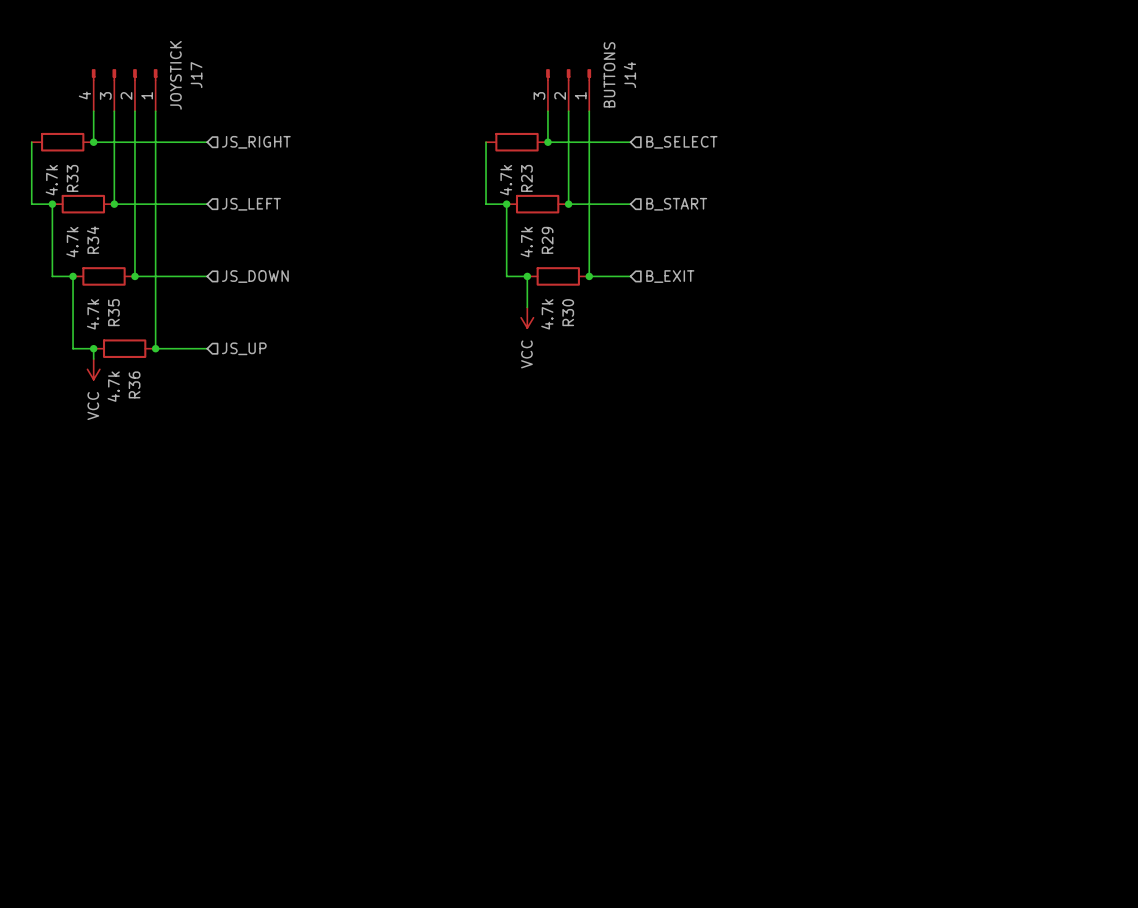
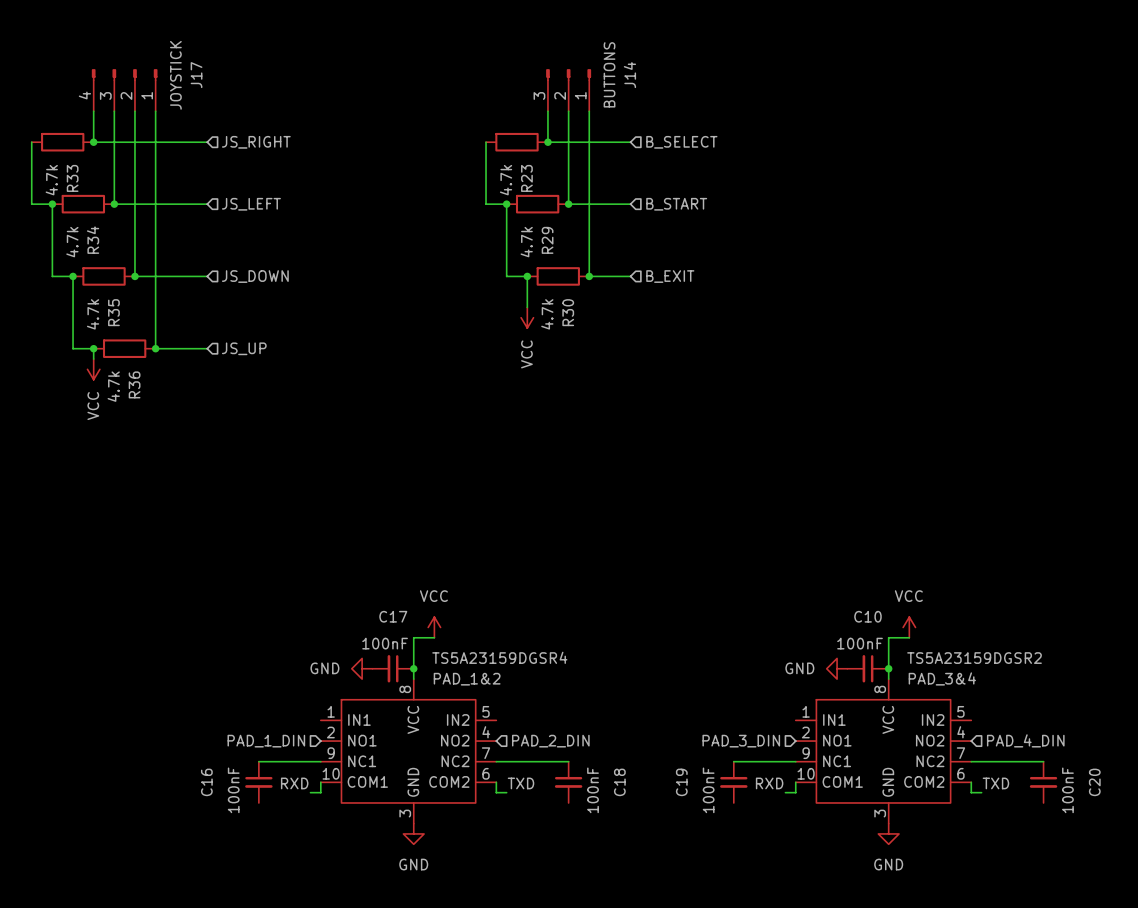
power symbol: none -> VCC (434, 627)
power symbol: none -> VCC (909, 627)
wire: none -> (434, 637) (413, 637) (413, 679)
wire: none -> (909, 637) (888, 637) (888, 679)
power symbol: none -> GND (362, 668)
C17: none -> 100nF (393, 668)
junction: none -> (413, 668)
power symbol: none -> GND (837, 668)
C10: none -> 100nF (868, 668)
junction: none -> (888, 668)
hierarchical label: none -> PAD_4_DIN (1025, 740)
hierarchical label: none -> PAD_1_DIN (266, 741)
hierarchical label: none -> PAD_2_DIN (550, 741)
hierarchical label: none -> PAD_3_DIN (741, 741)
TS5A23159DGSR4: none -> PAD_1&2 (408, 751)
TS5A23159DGSR2: none -> PAD_3&4 (883, 751)
wire: none -> (258, 761) (320, 761)
wire: none -> (496, 761) (568, 761)
wire: none -> (733, 761) (795, 761)
wire: none -> (971, 761) (1043, 761)
C16: none -> 100nF (258, 782)
wire: none -> (320, 782) (320, 792) (310, 792)
wire: none -> (496, 782) (496, 792) (506, 792)
C18: none -> 100nF (568, 782)
C19: none -> 100nF (733, 782)
wire: none -> (795, 782) (795, 792) (785, 792)
wire: none -> (971, 782) (971, 792) (981, 792)
C20: none -> 100nF (1043, 782)
label: none -> RXD (294, 783)
label: none -> TXD (521, 783)
label: none -> RXD (769, 783)
label: none -> TXD (995, 783)
power symbol: none -> GND (413, 833)
power symbol: none -> GND (888, 833)

